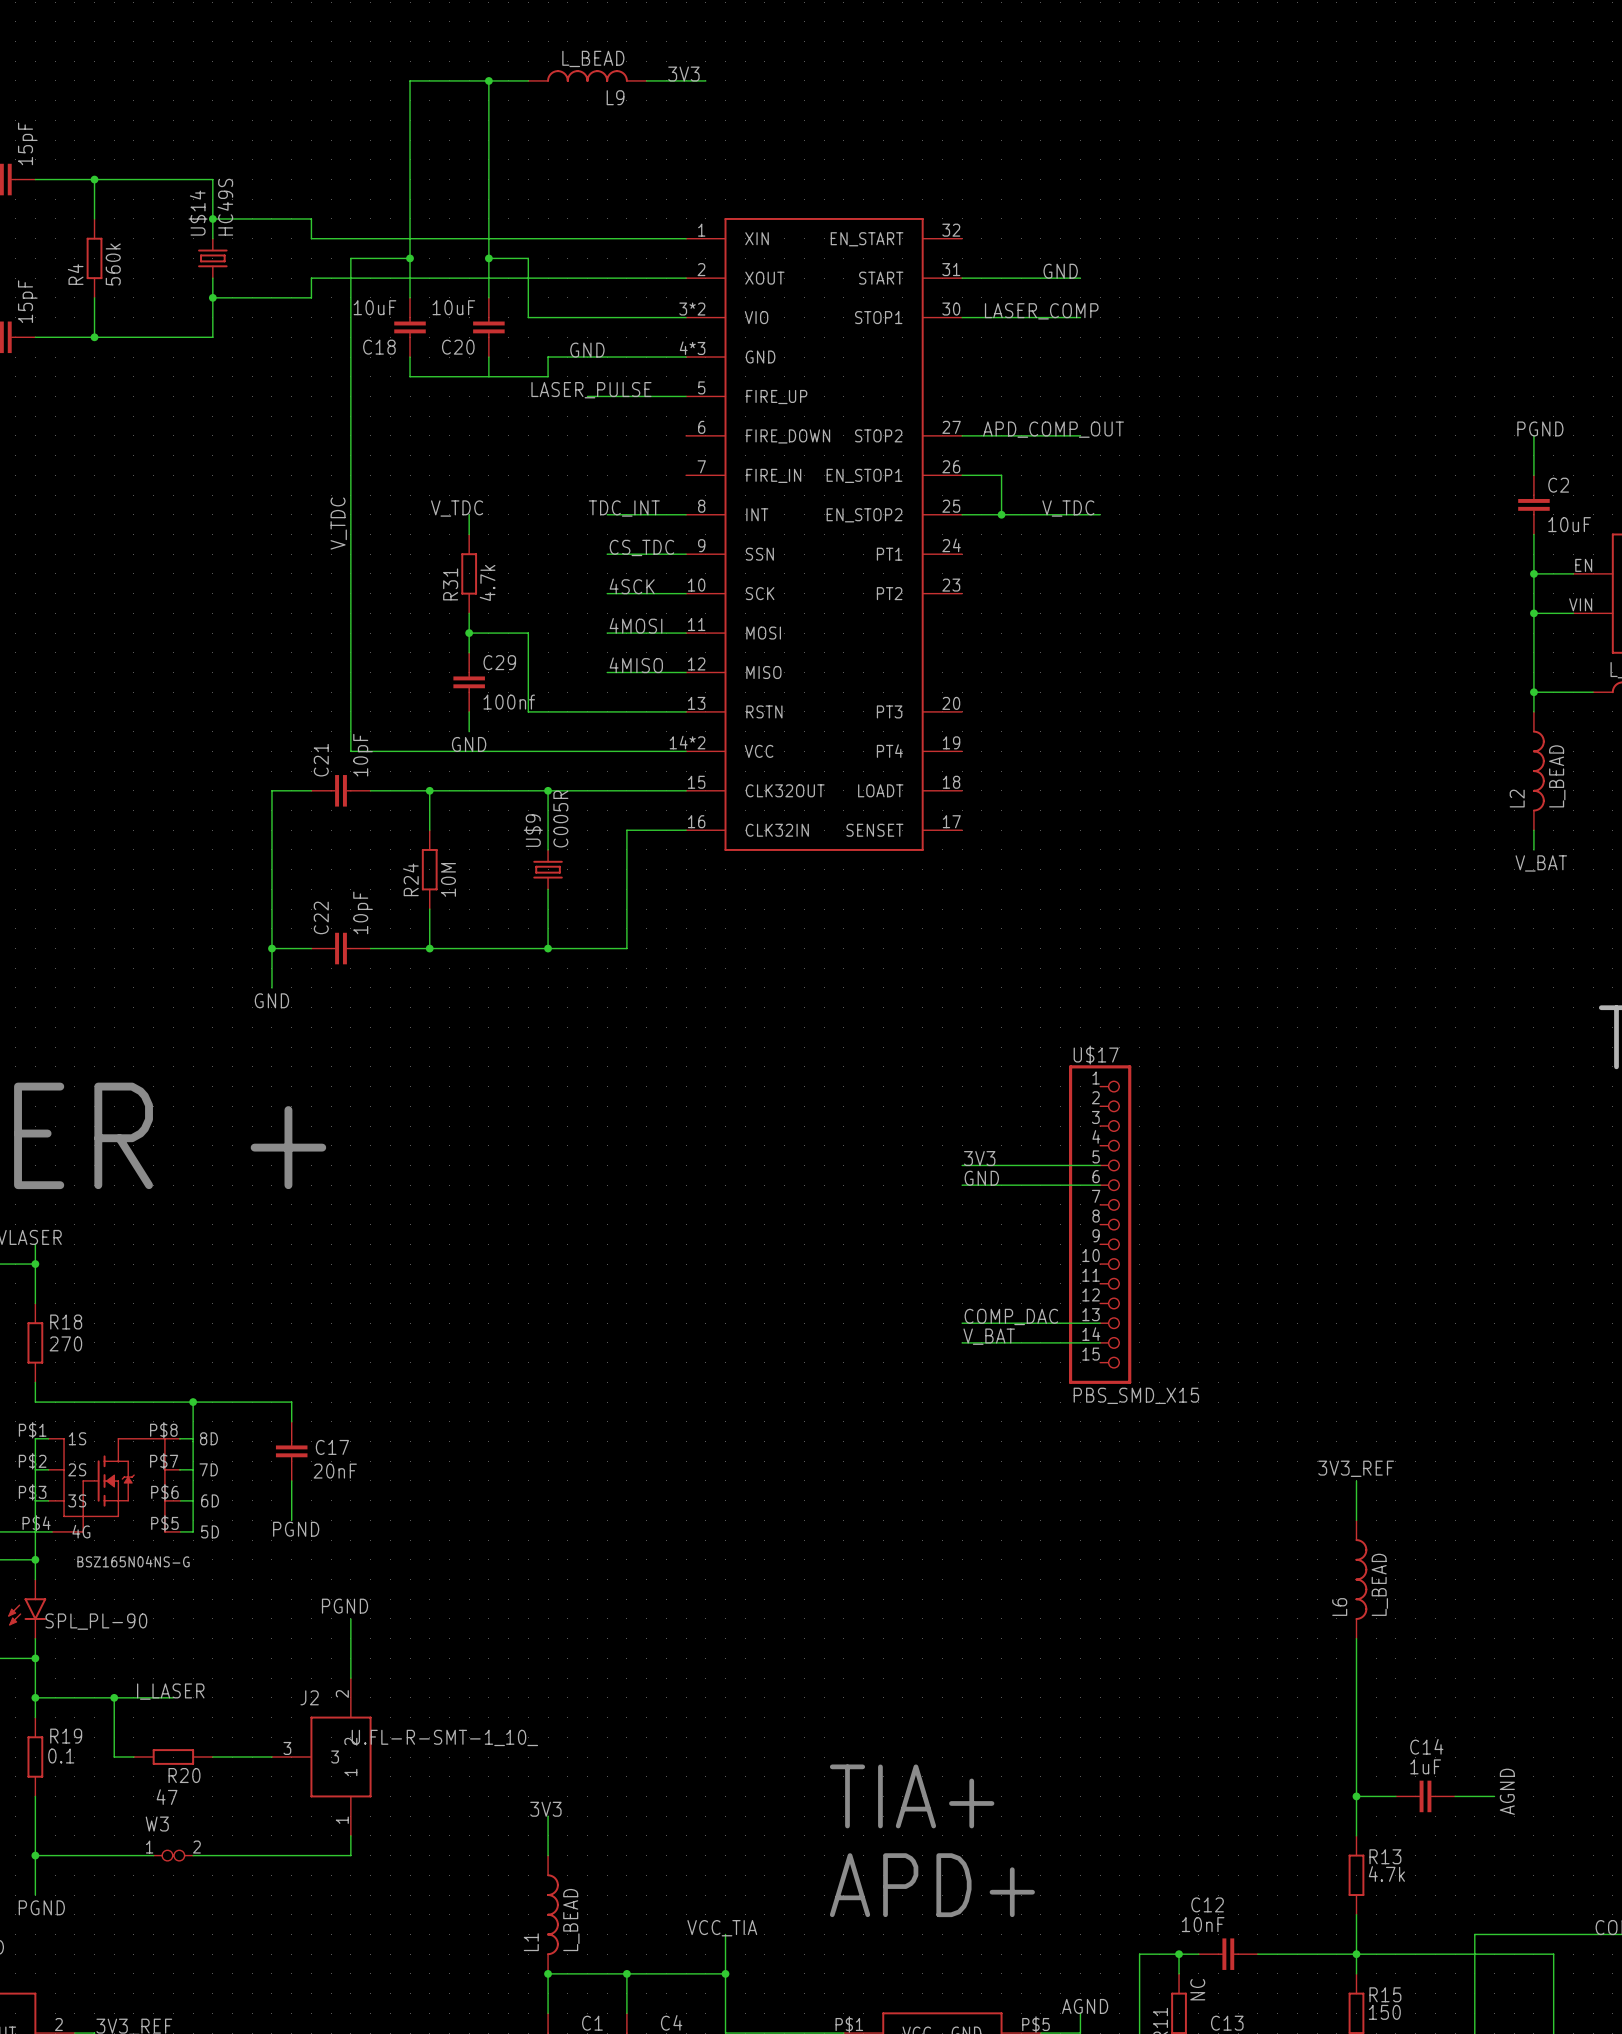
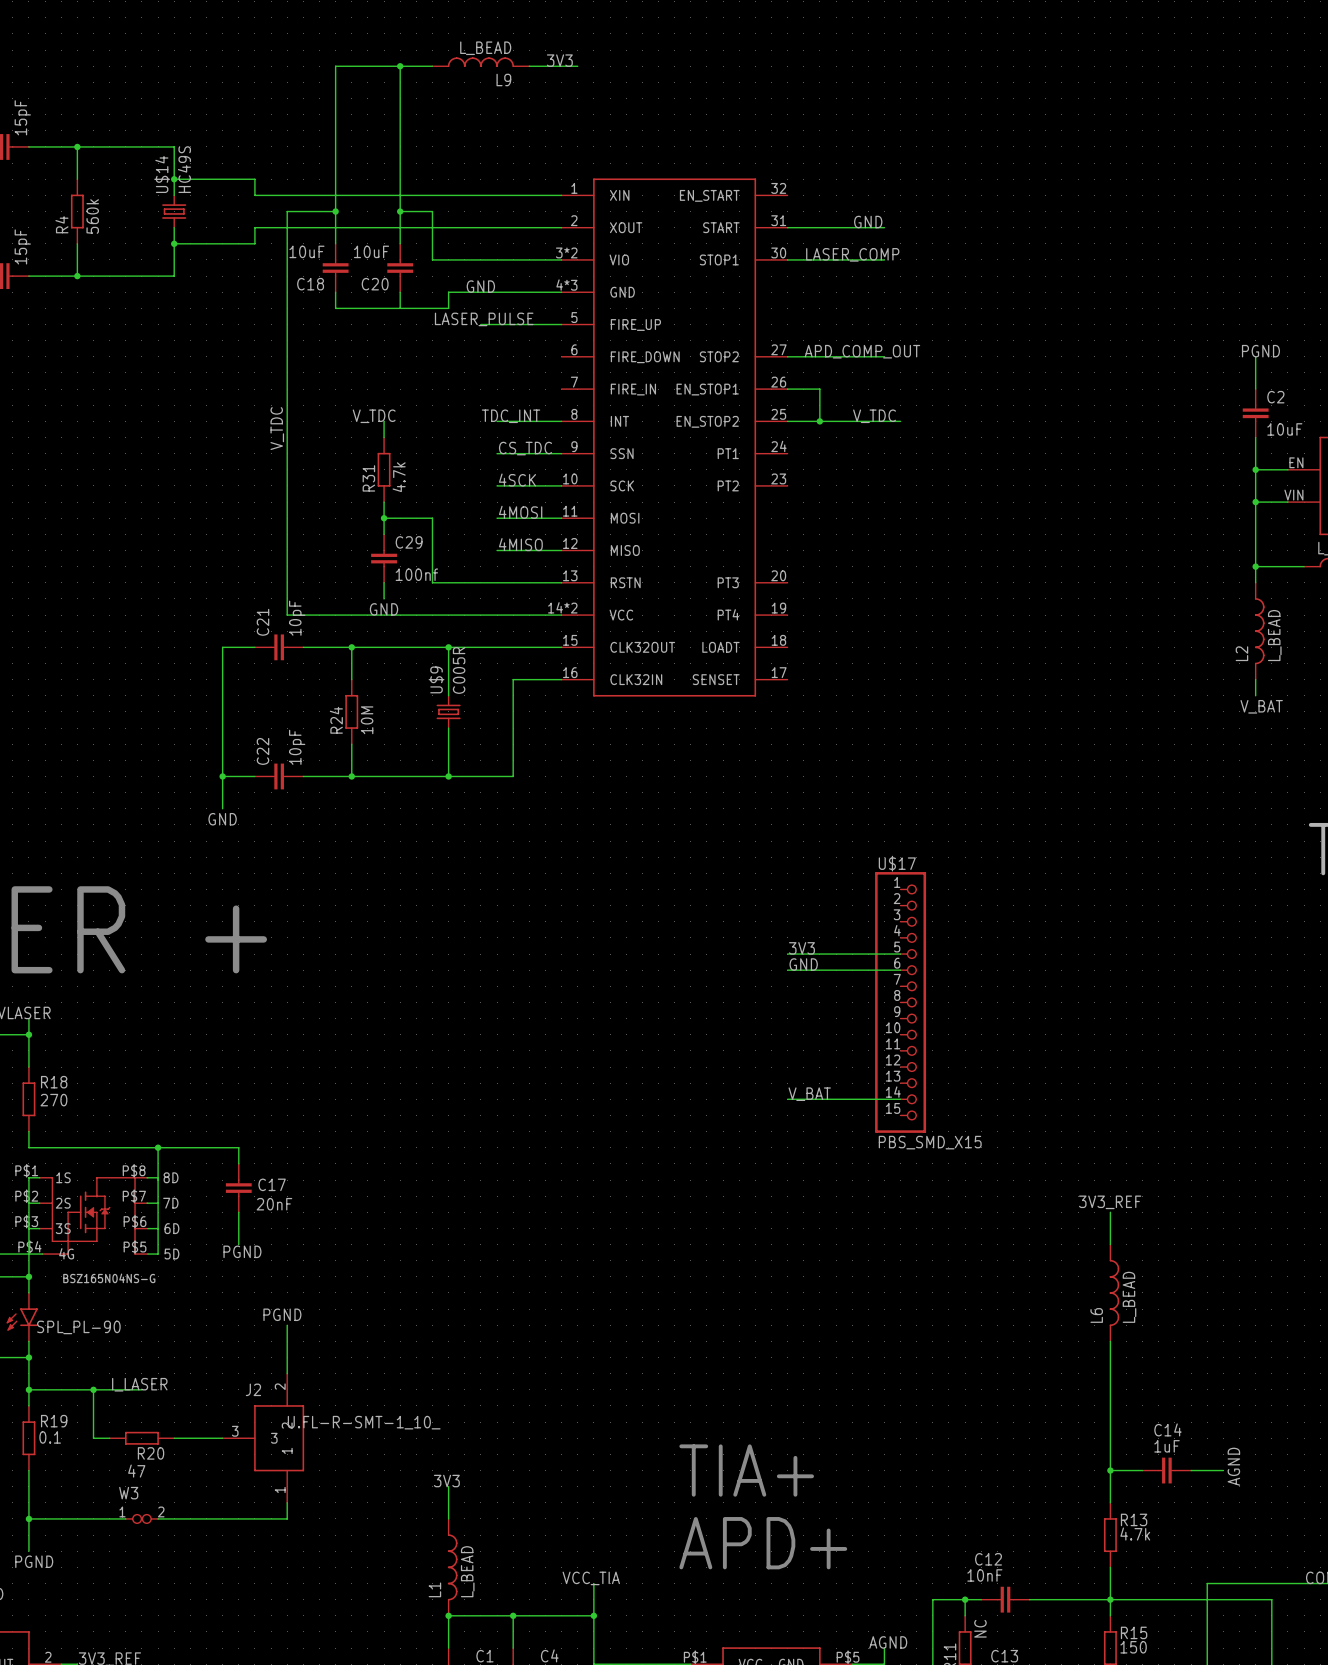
label: COMP_DAC (1011, 1316) -> none
wire: (962, 1323) (1100, 1323) -> none

